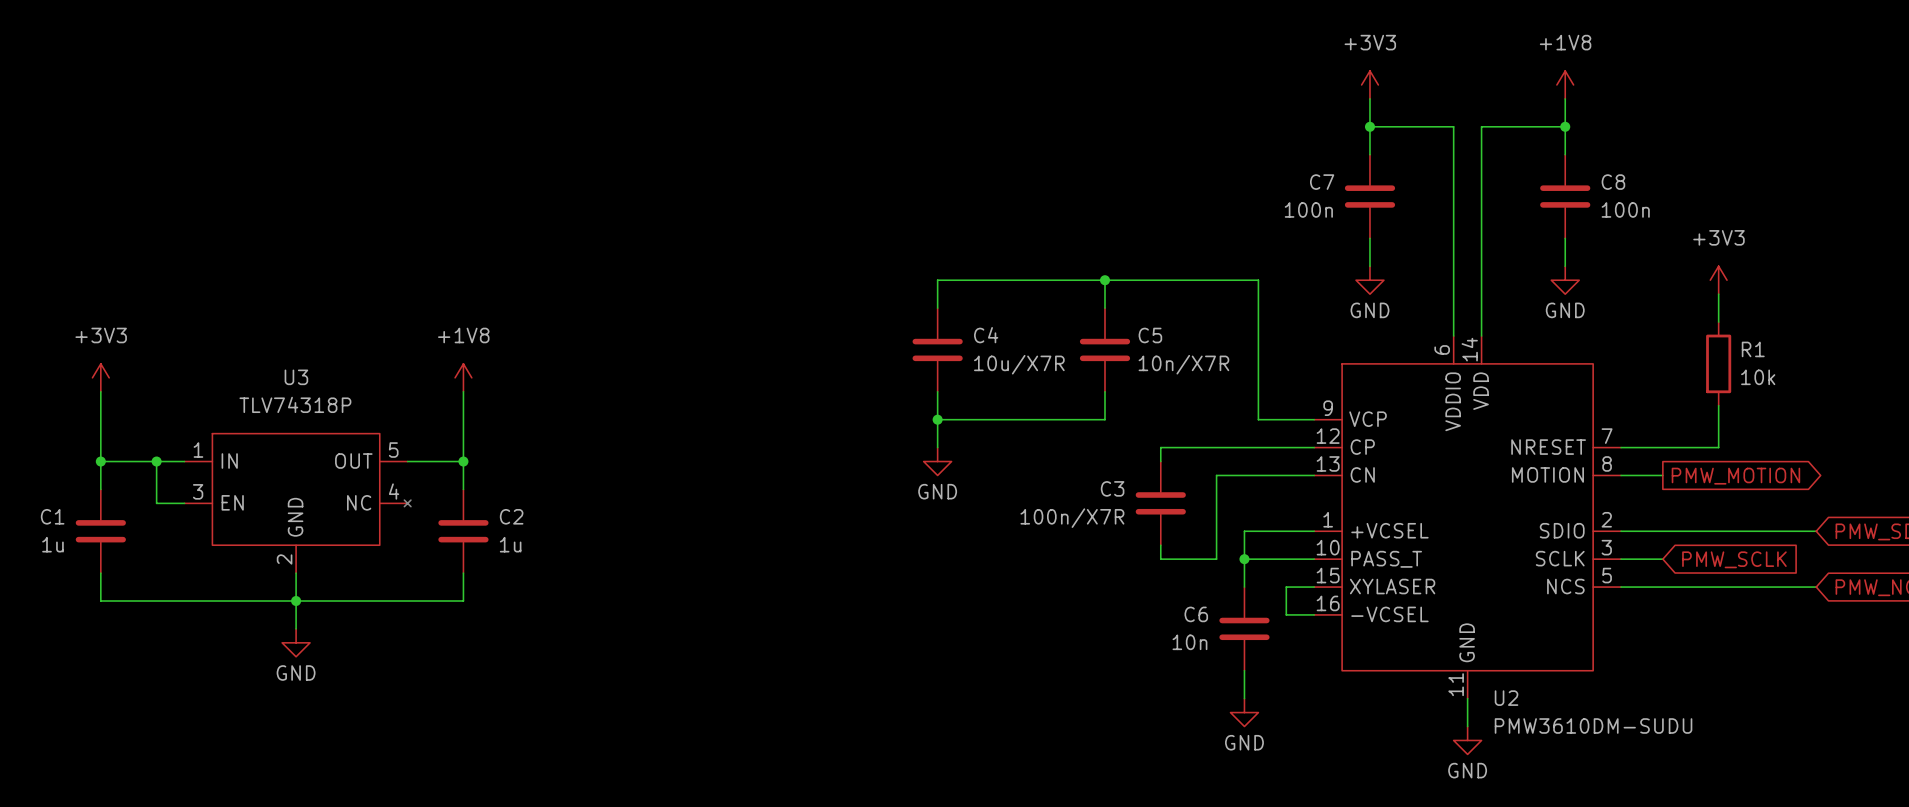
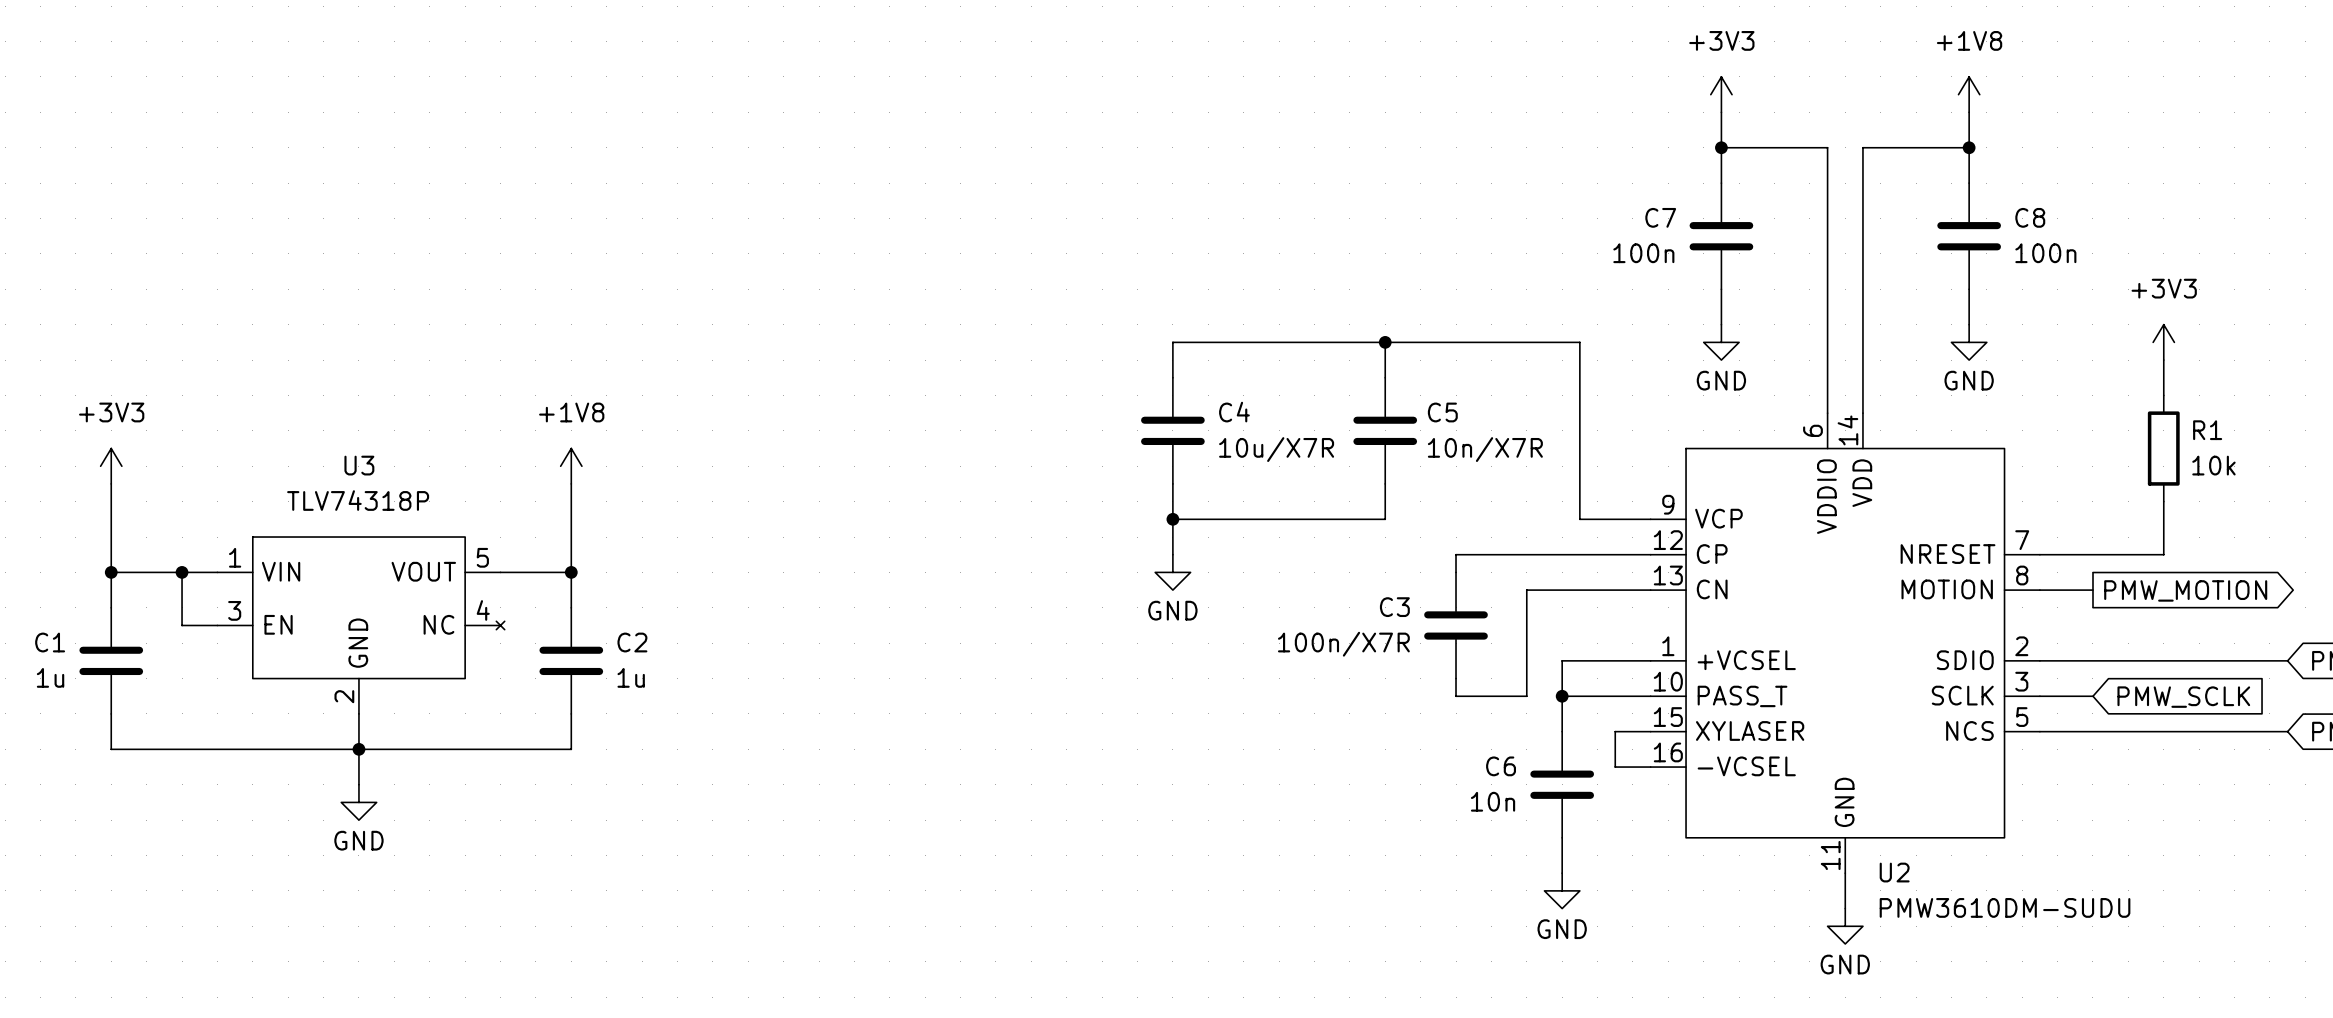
U3 pin name: IN (229, 461) -> VIN (281, 571)
U3 pin name: OUT (353, 461) -> VOUT (423, 571)

